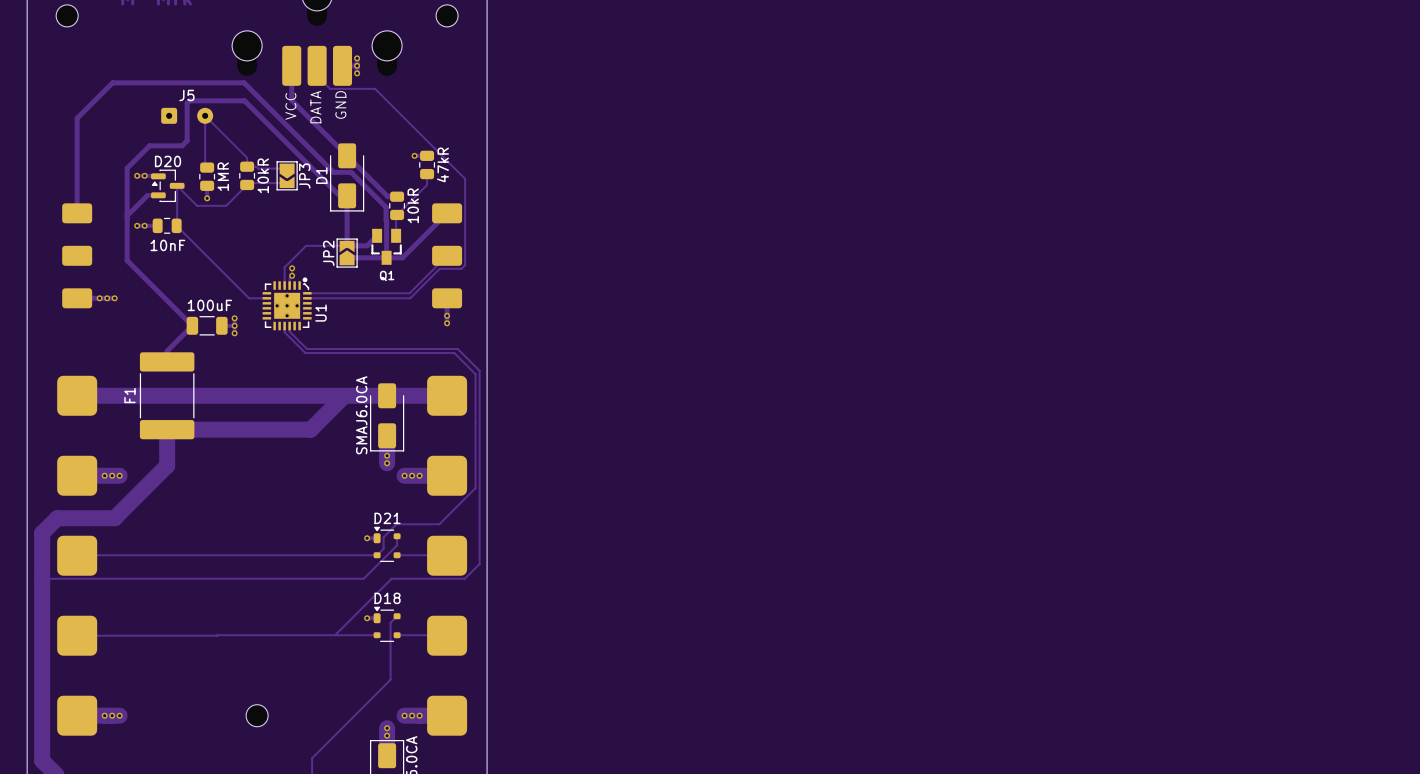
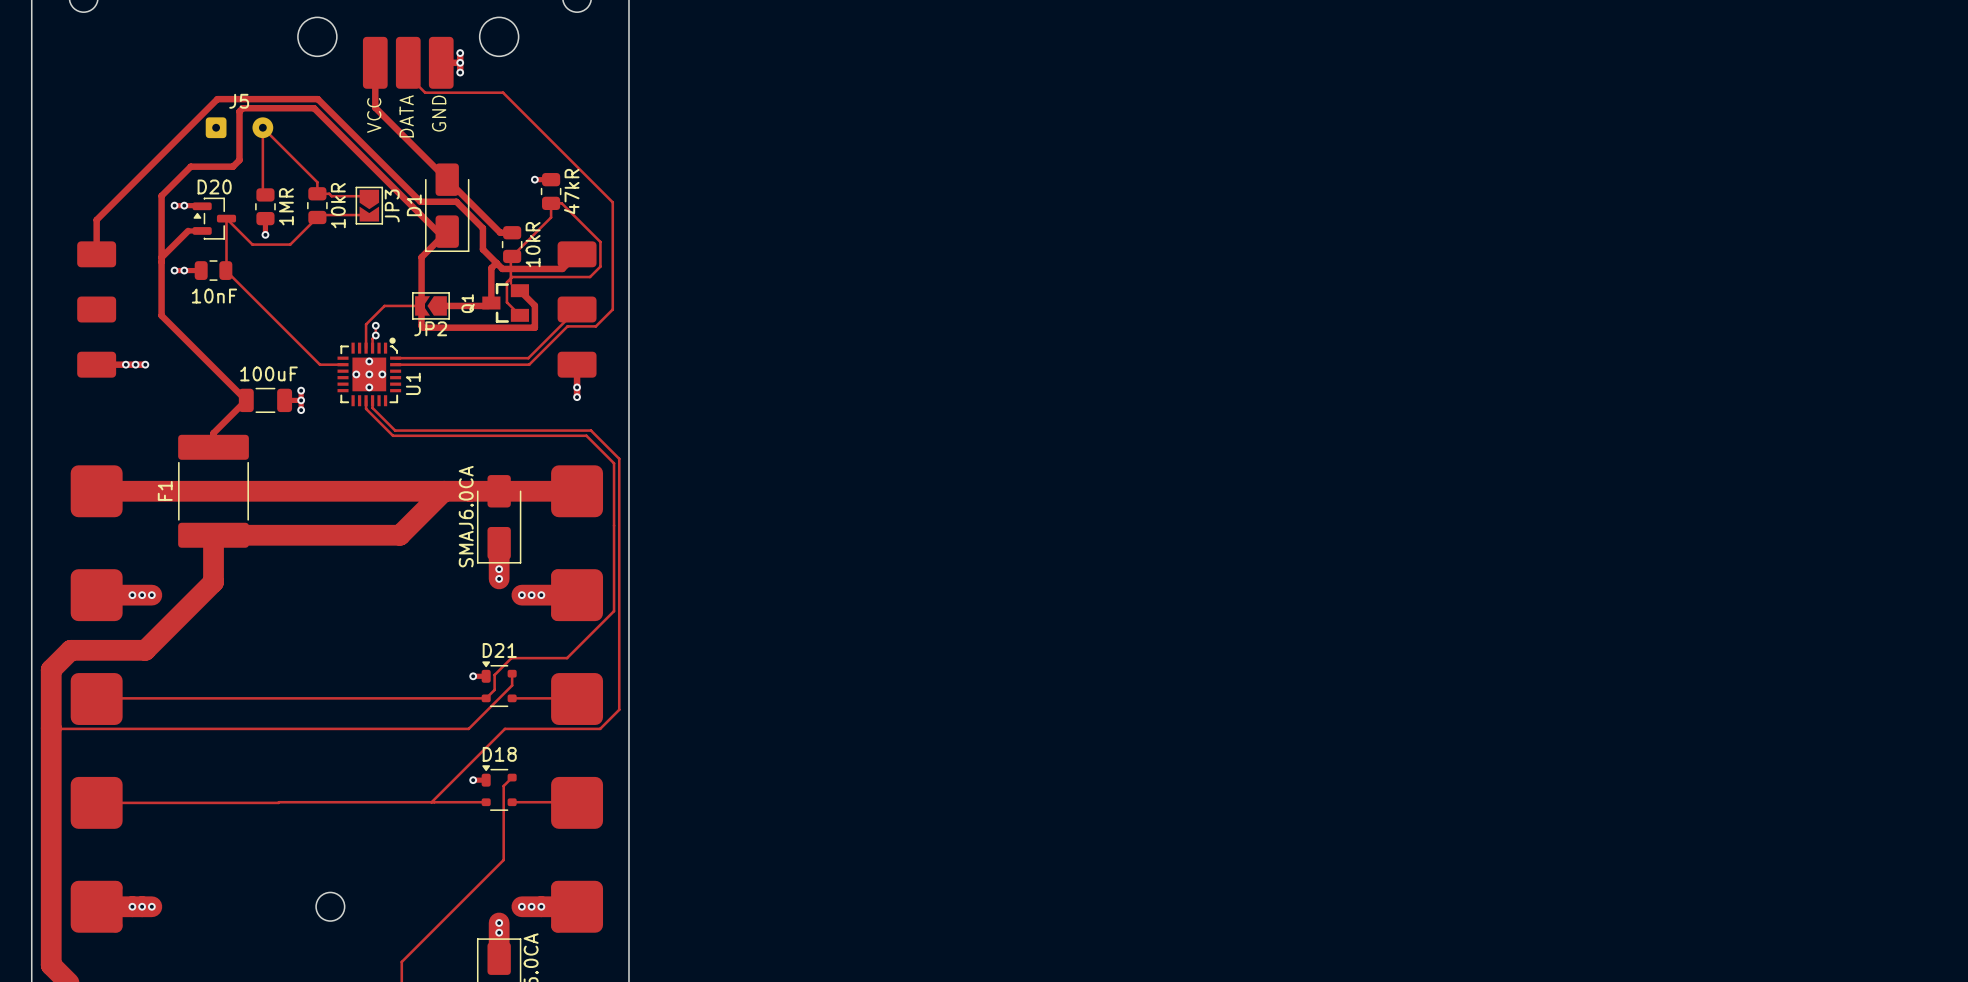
track: (375, 88) (465, 178) (465, 203) -> (483, 92) (503, 92) (612, 202) (612, 309) (600, 321)
track: none -> (551, 203) (561, 203) (600, 242)
track: (77, 186) (77, 118) (112, 82) (244, 82) (333, 172) (351, 172) (386, 207) (386, 257) -> (96, 219) (217, 99) (317, 99) (420, 201) (456, 201) (482, 228) (482, 249) (502, 268) (562, 268)
track: (347, 195) (347, 245) -> (447, 231) (421, 257) (421, 305) (384, 305)
track: none -> (496, 263) (491, 268) (491, 303) (488, 305) (440, 305)
track: (465, 222) (465, 265) -> (600, 266) (590, 277) (512, 277) (506, 282) (506, 302) (519, 315)
track: (435, 224) (402, 257) (349, 257) (347, 260) -> none
track: (377, 235) (367, 245) (347, 245) -> none
track: none -> (519, 290) (534, 305) (534, 327) (423, 327) (421, 325) (421, 305)
track: (347, 245) (306, 245) (298, 253) -> none
Q1 rotation: 0° (386, 246) -> 90° clockwise (505, 303)
JP2 rotation: 0° (347, 253) -> 90° counterclockwise (430, 305)

